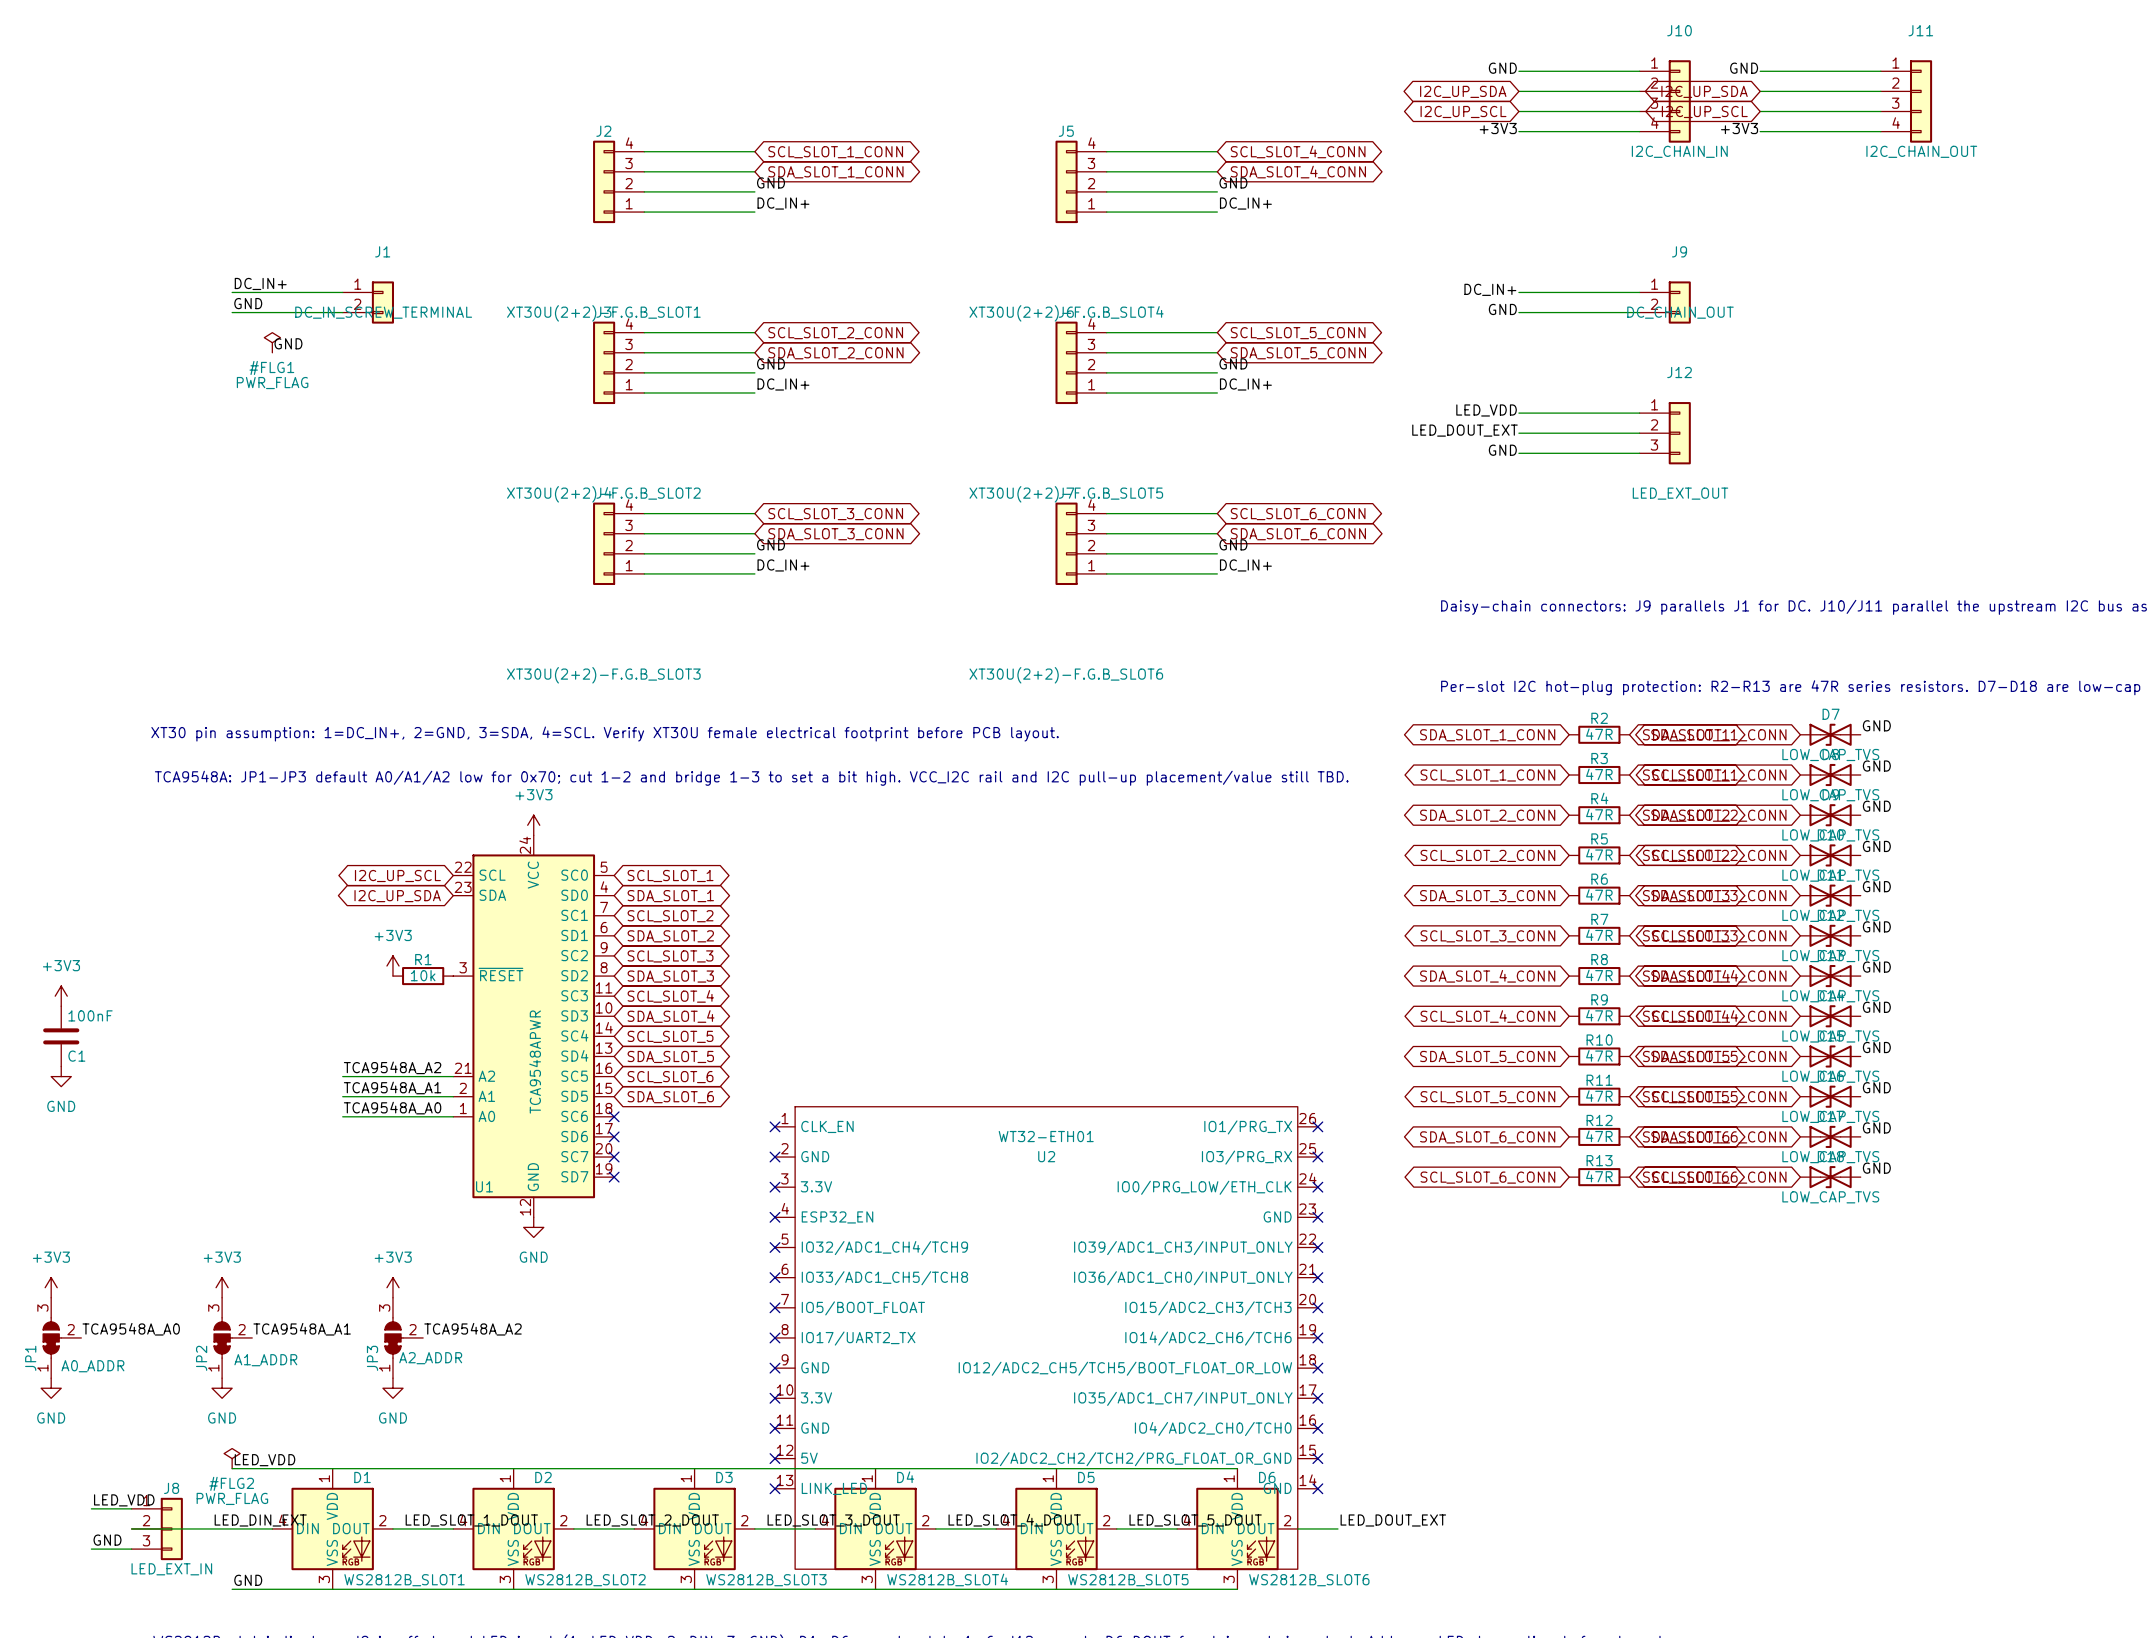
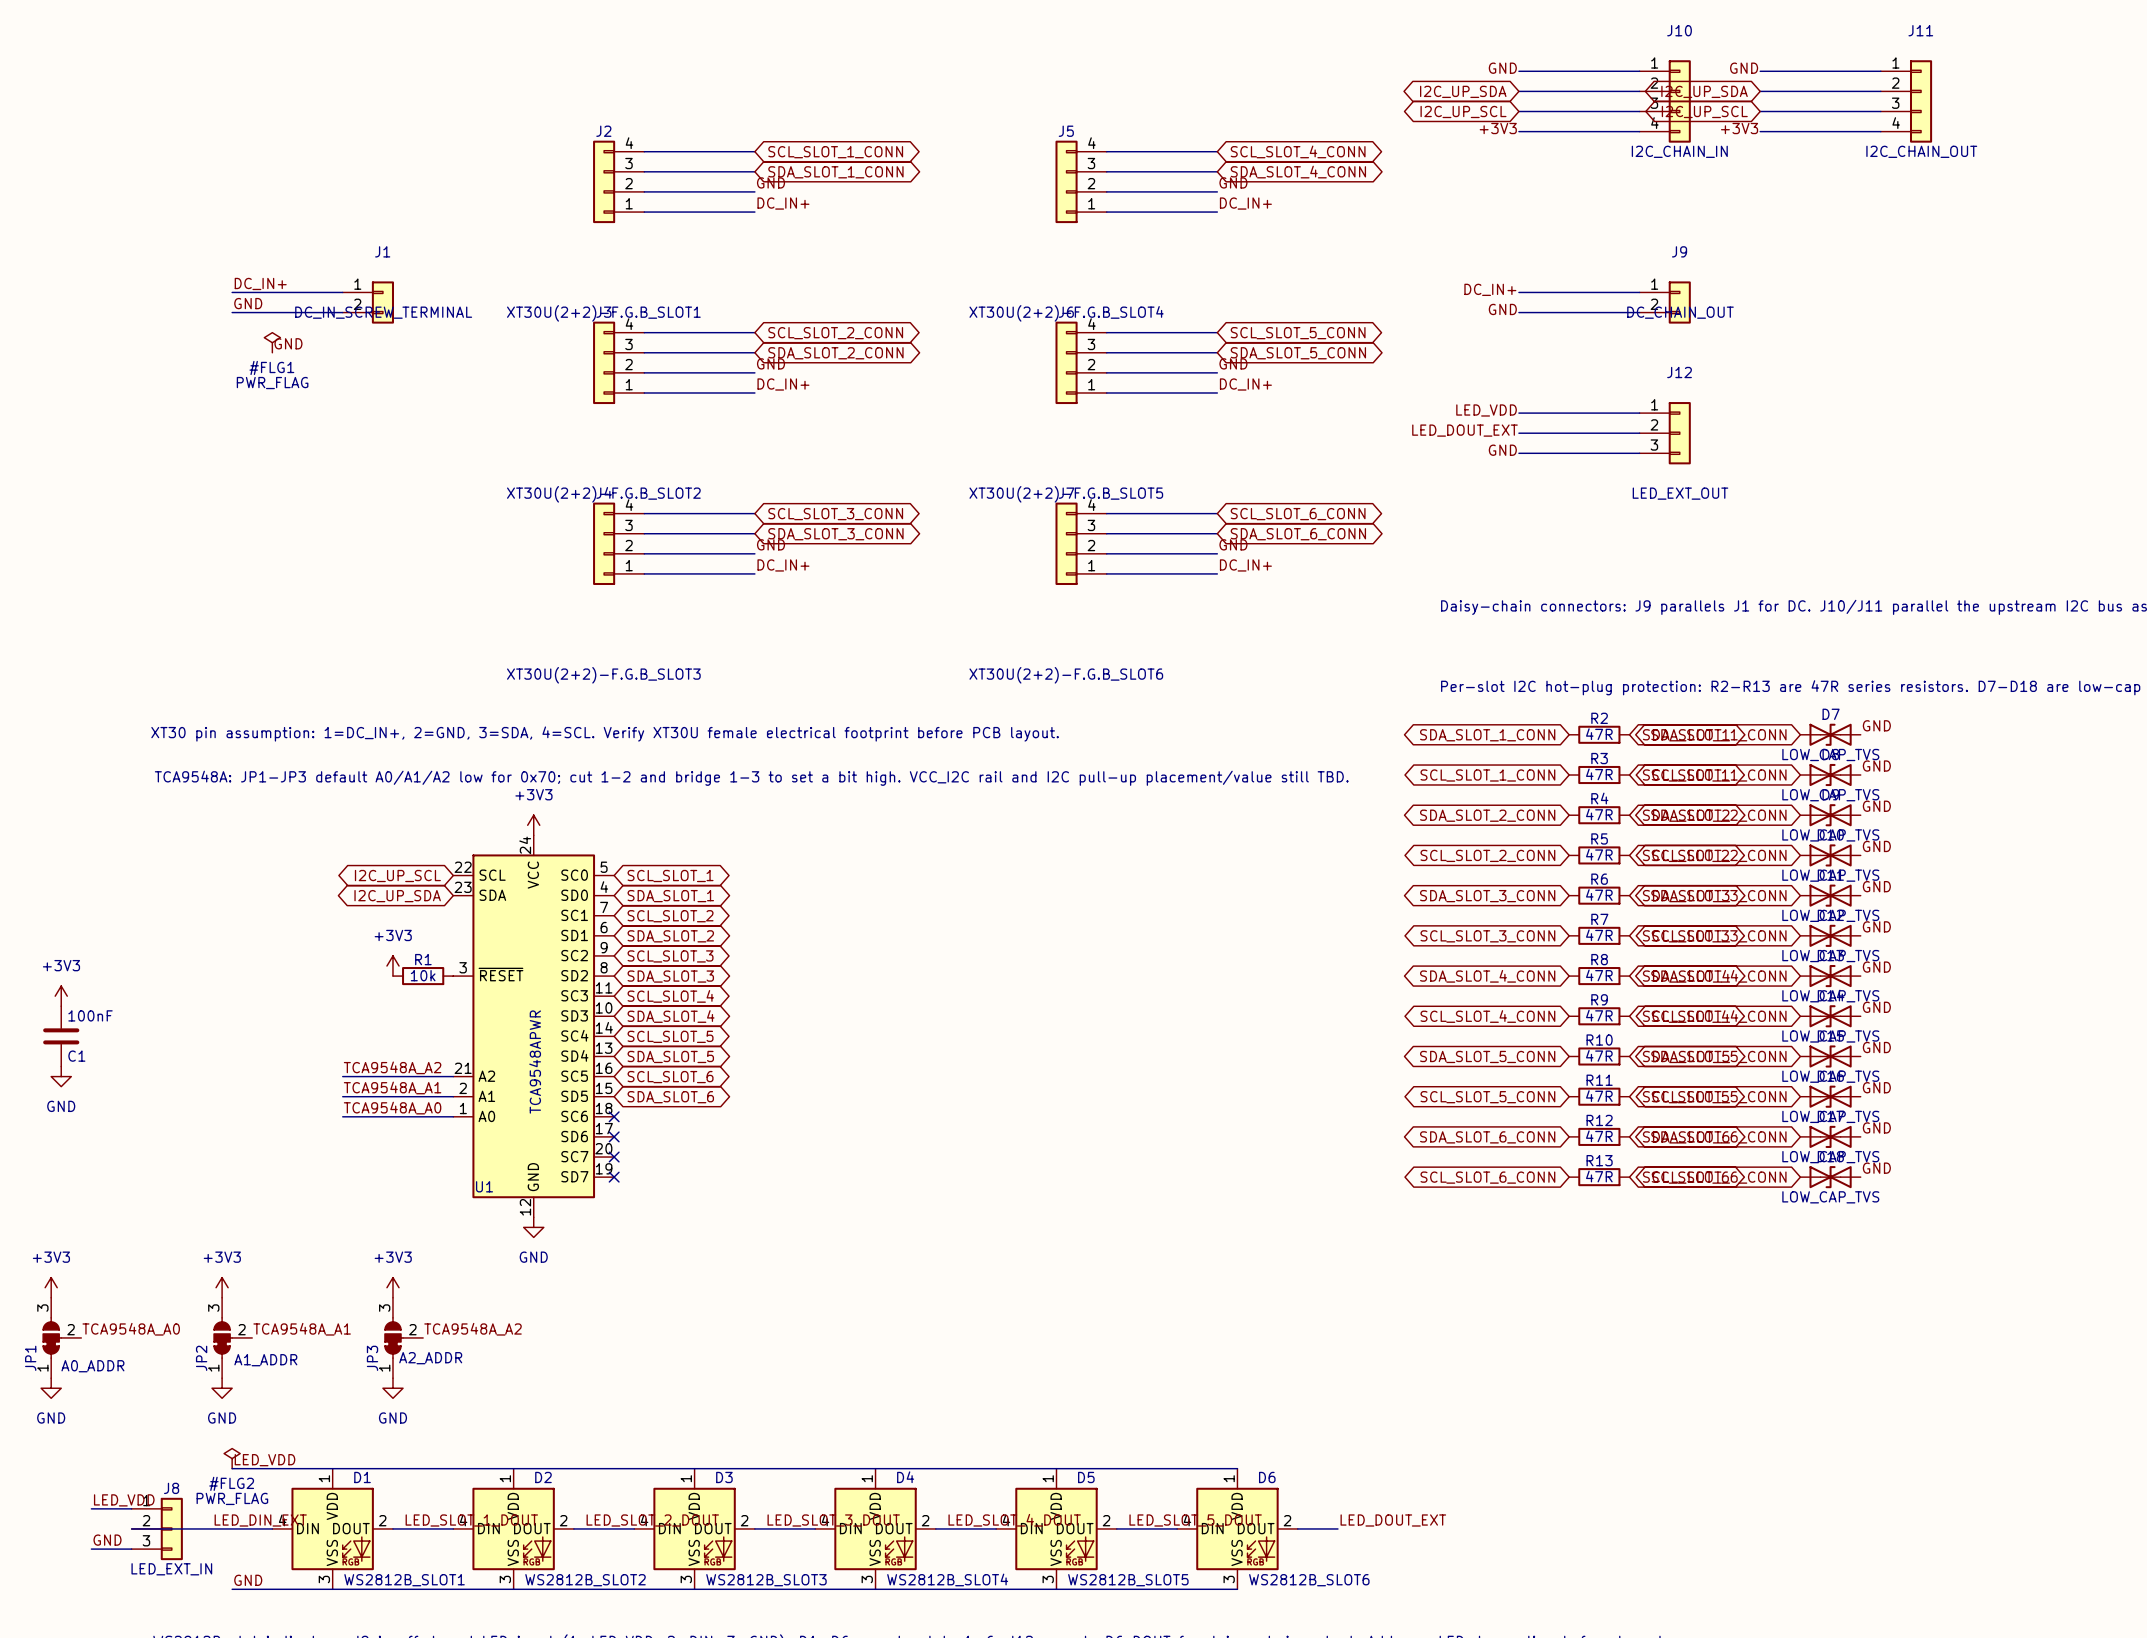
no-connect mark: (775, 1126) -> none
no-connect mark: (1317, 1126) -> none
no-connect mark: (775, 1157) -> none
no-connect mark: (1317, 1157) -> none
no-connect mark: (775, 1187) -> none
no-connect mark: (1317, 1187) -> none
no-connect mark: (775, 1217) -> none
no-connect mark: (1317, 1217) -> none
no-connect mark: (775, 1247) -> none
no-connect mark: (1317, 1247) -> none
no-connect mark: (775, 1277) -> none
no-connect mark: (1317, 1277) -> none
no-connect mark: (775, 1307) -> none
no-connect mark: (1317, 1307) -> none
no-connect mark: (775, 1337) -> none
U2: WT32-ETH01 (1046, 1337) -> none
no-connect mark: (1317, 1337) -> none
no-connect mark: (775, 1368) -> none
no-connect mark: (1317, 1368) -> none
no-connect mark: (775, 1398) -> none
no-connect mark: (1317, 1398) -> none
no-connect mark: (775, 1428) -> none
no-connect mark: (1317, 1428) -> none
no-connect mark: (775, 1458) -> none
no-connect mark: (1317, 1458) -> none
no-connect mark: (775, 1488) -> none
no-connect mark: (1317, 1488) -> none

